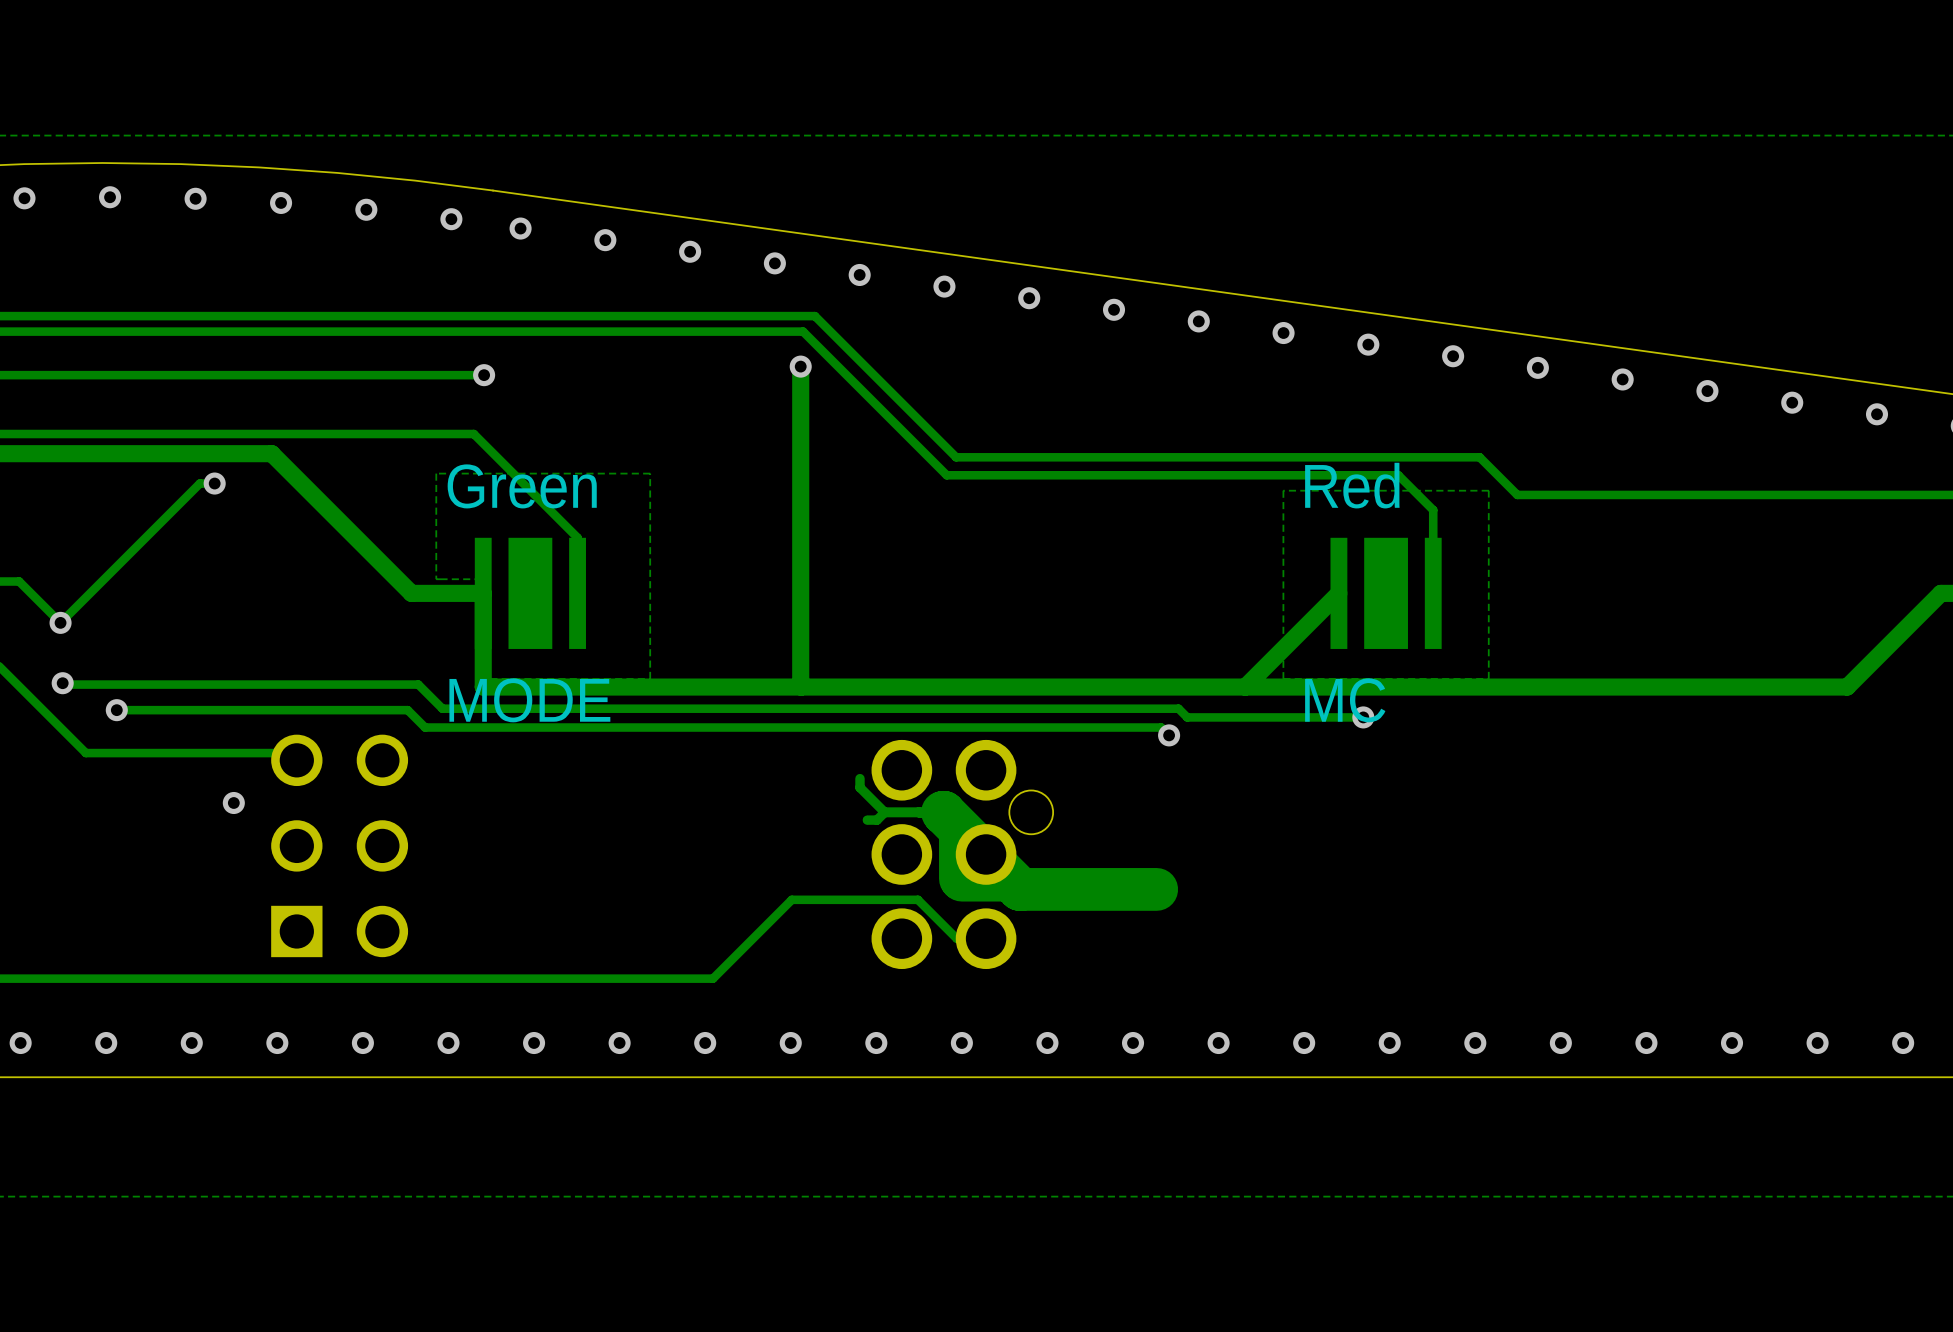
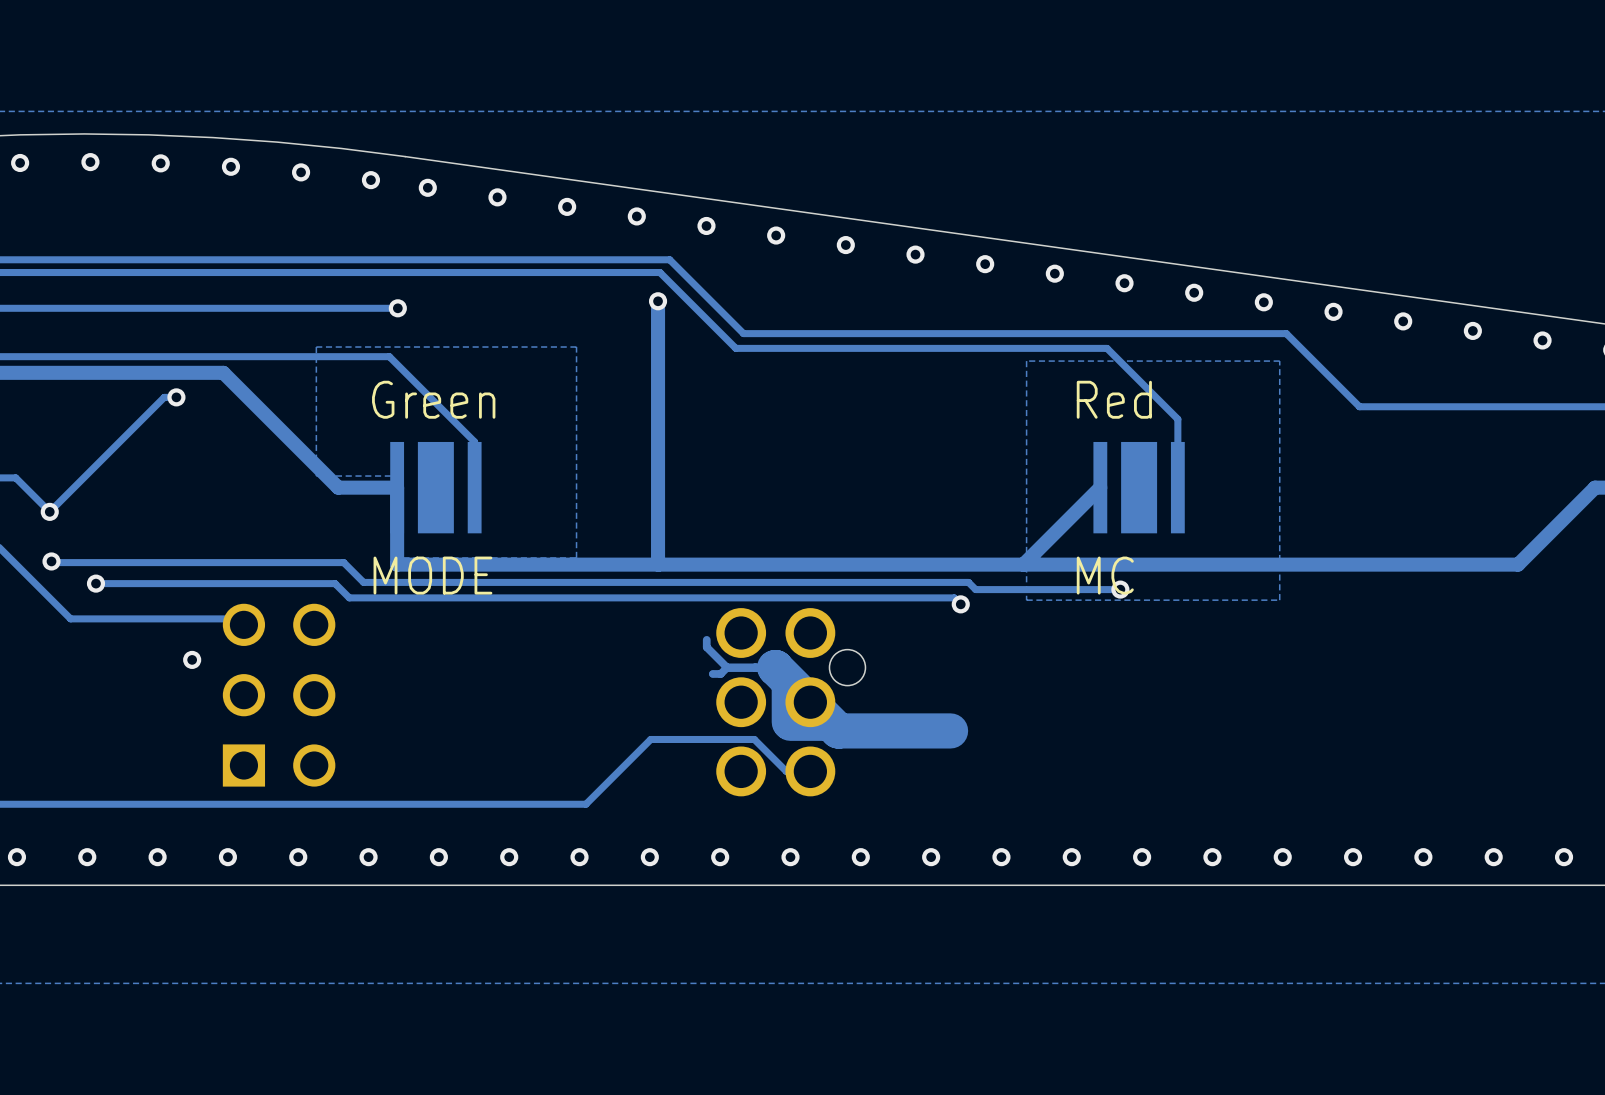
track: (904, 405) (956, 457) (1479, 457) (1517, 494) (1654, 494) -> (743, 333) (1286, 333) (1359, 406)
track: (895, 423) (946, 475) (1398, 475) -> (735, 348) (1107, 348) (1149, 390)
zone outline: none -> (1279, 361) (1026, 361) (1026, 600) (1279, 600) (1279, 361)
zone outline: (1488, 490) (1283, 490) (1283, 678) (1488, 678) (1488, 490) -> none
zone outline: (436, 579) (436, 473) (650, 473) (650, 678) -> (358, 476) (316, 476) (316, 347) (576, 347) (576, 557) (534, 557)

